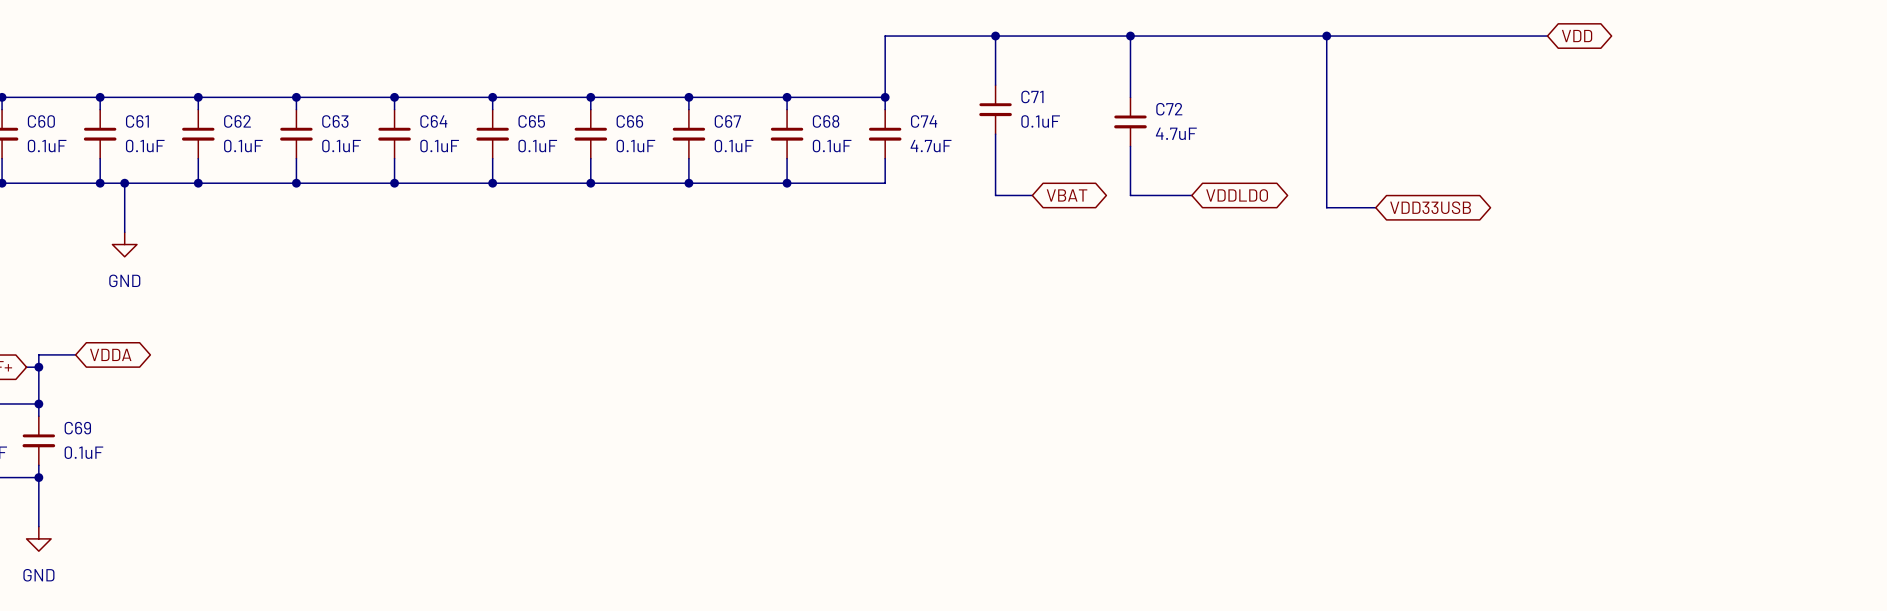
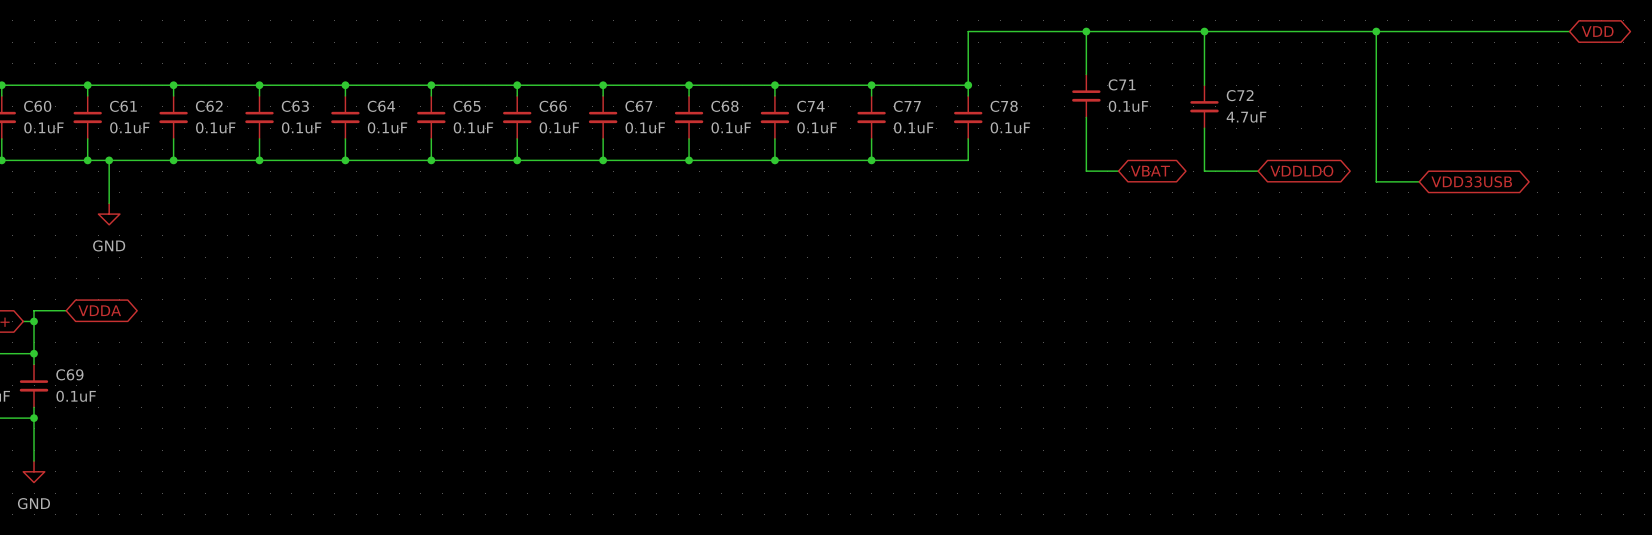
wire: (995, 36) (995, 85) -> none
junction: (995, 36) -> none
wire: (1105, 36) (885, 36) (885, 97) -> (968, 85) (774, 85)
wire: none -> (968, 31) (968, 95)
wire: (1130, 36) (1130, 97) -> none
junction: (1130, 36) -> none
wire: none -> (1086, 31) (1086, 74)
junction: none -> (1086, 31)
wire: (1326, 36) (1326, 207) (1375, 207) -> none
junction: (1326, 36) -> none
wire: none -> (1204, 31) (1204, 85)
junction: none -> (1204, 31)
wire: none -> (1354, 31) (1569, 31)
wire: none -> (1376, 31) (1376, 181) (1419, 181)
junction: none -> (1376, 31)
global label: VDD (1577, 36) -> none
global label: none -> VDD (1597, 31)
junction: none -> (871, 85)
junction: none -> (968, 85)
C71 position: (995, 109) -> (1086, 95)
C72 position: (1130, 121) -> (1204, 106)
C77: none -> 0.1uF (871, 117)
C78: none -> 0.1uF (968, 117)
wire: none -> (1086, 117) (1086, 171) (1118, 171)
C74 value: 4.7uF (931, 146) -> 0.1uF (817, 127)
wire: (1130, 146) (1130, 195) (1191, 195) -> none
wire: none -> (1204, 128) (1204, 171) (1258, 171)
wire: none -> (968, 138) (968, 160) (774, 160)
junction: none -> (774, 160)
wire: (995, 183) (995, 195) (1032, 195) -> none
junction: none -> (871, 160)
global label: VBAT (1067, 195) -> none
global label: VDDLDO (1237, 195) -> none
global label: none -> VBAT (1150, 171)
global label: none -> VDDLDO (1301, 171)
global label: VDD33USB (1430, 207) -> none
global label: none -> VDD33USB (1471, 181)

